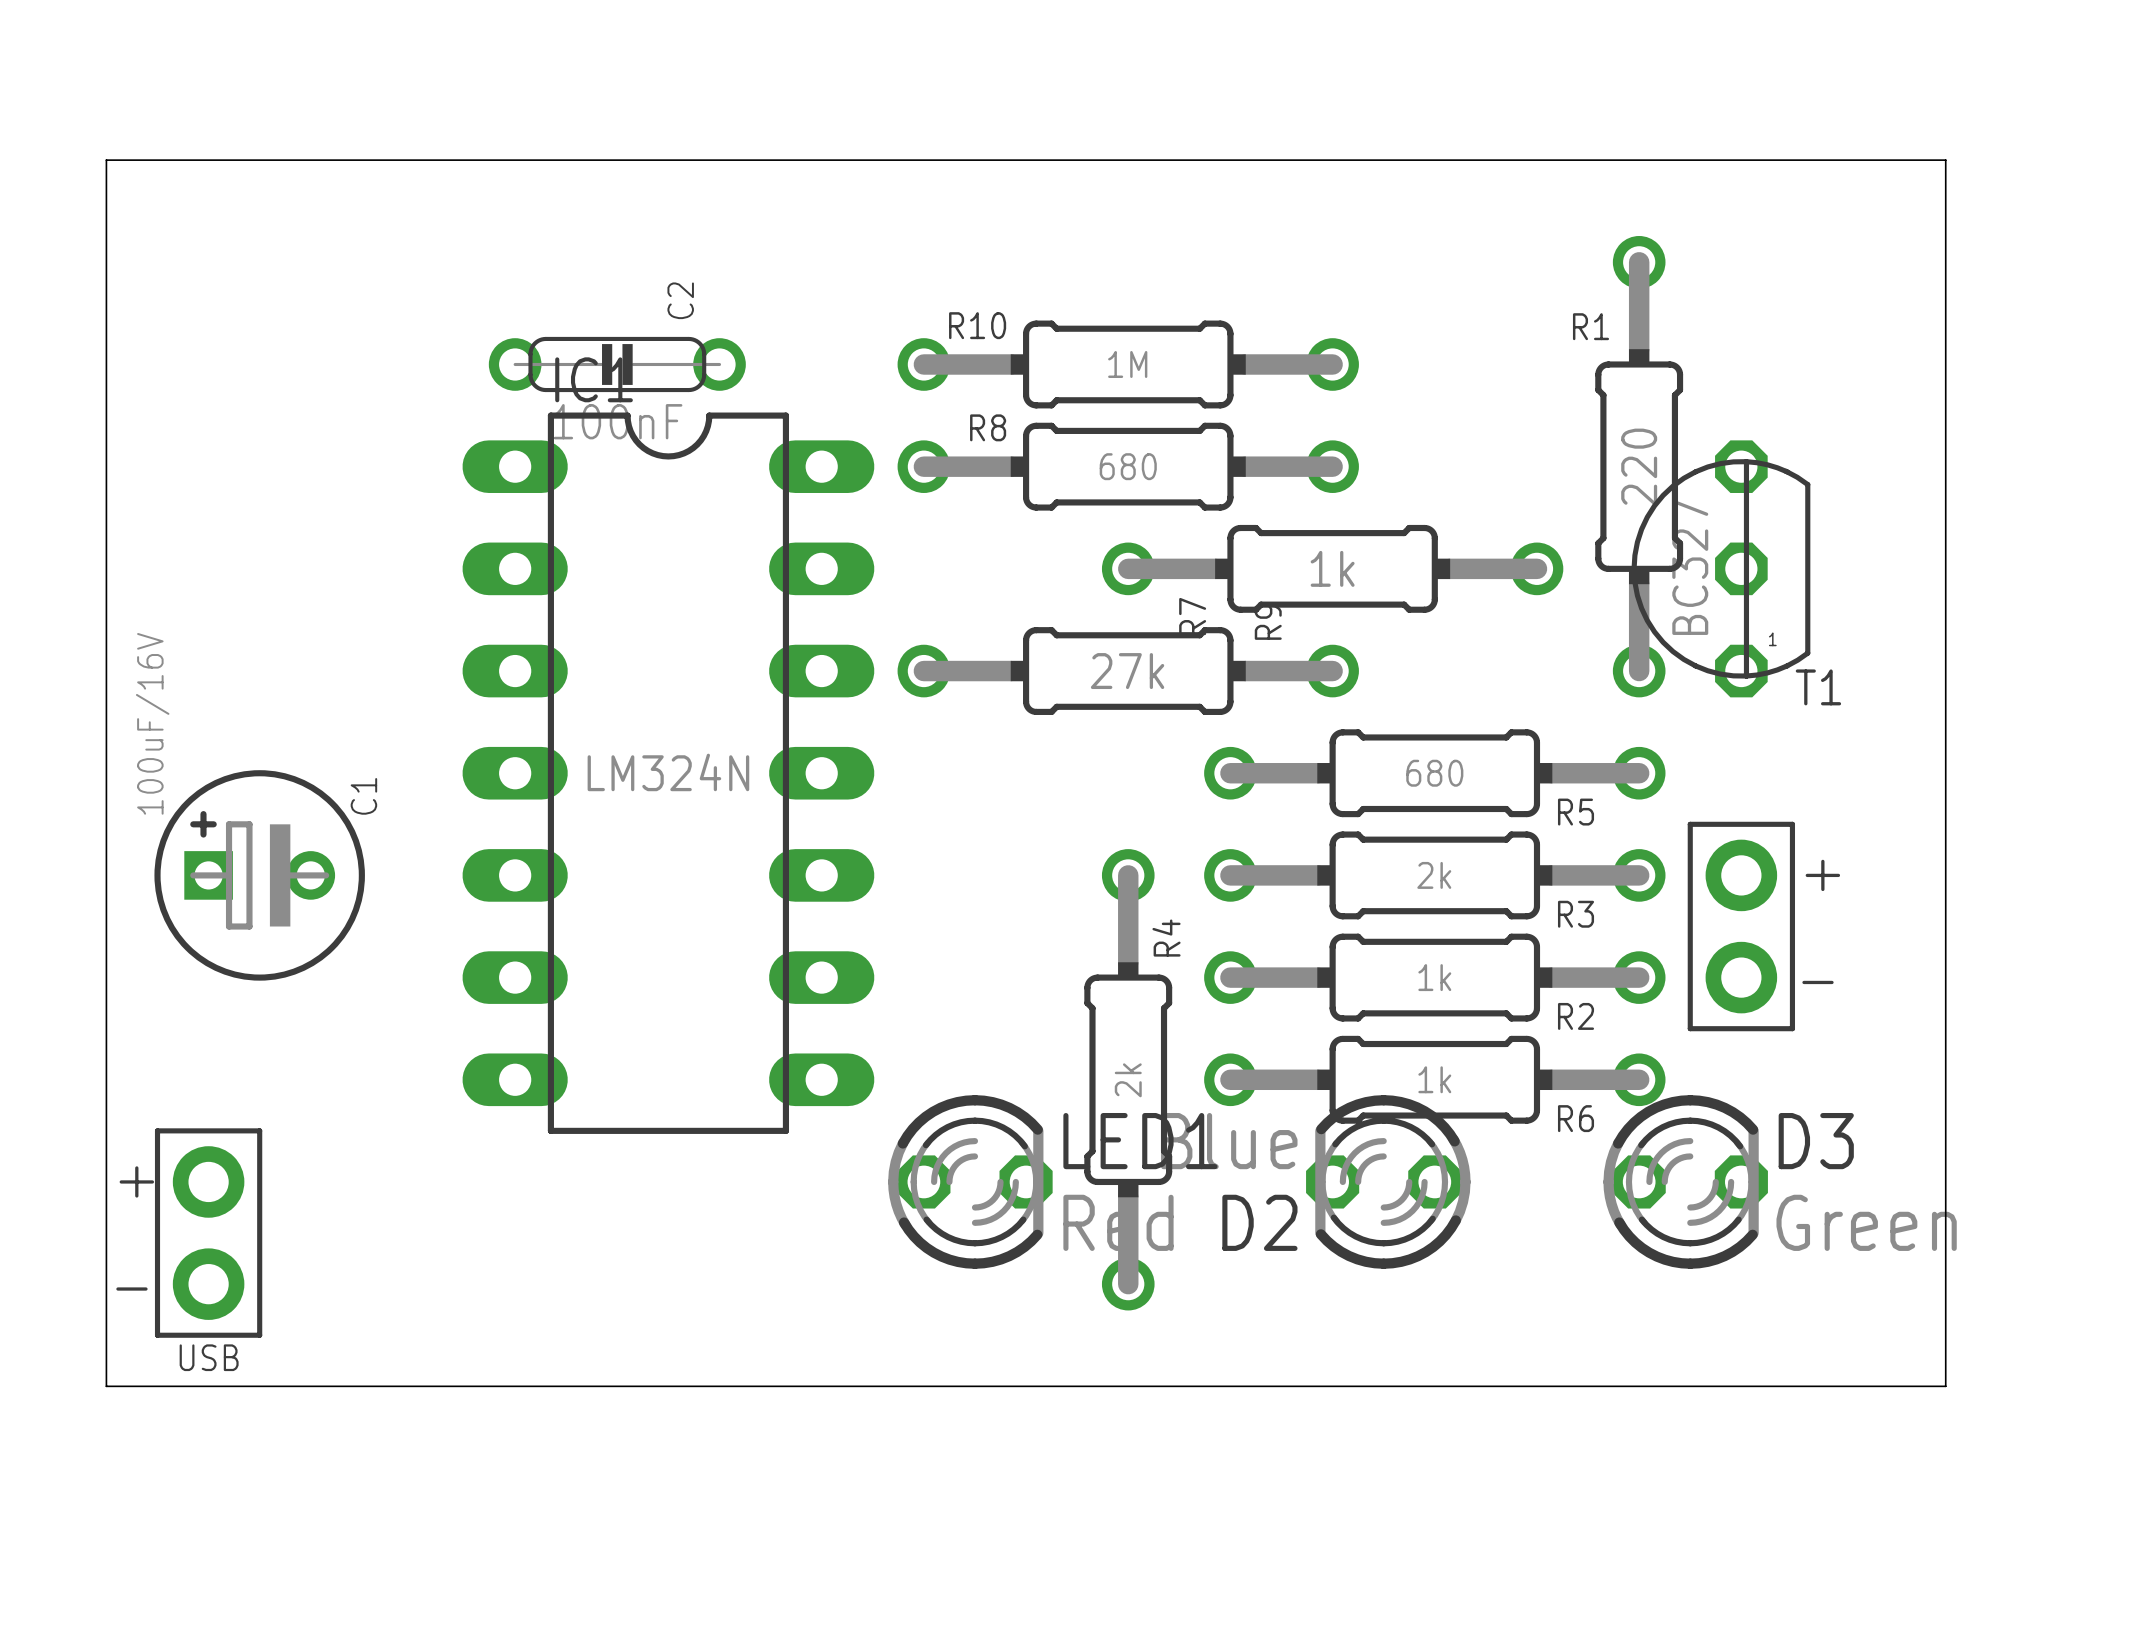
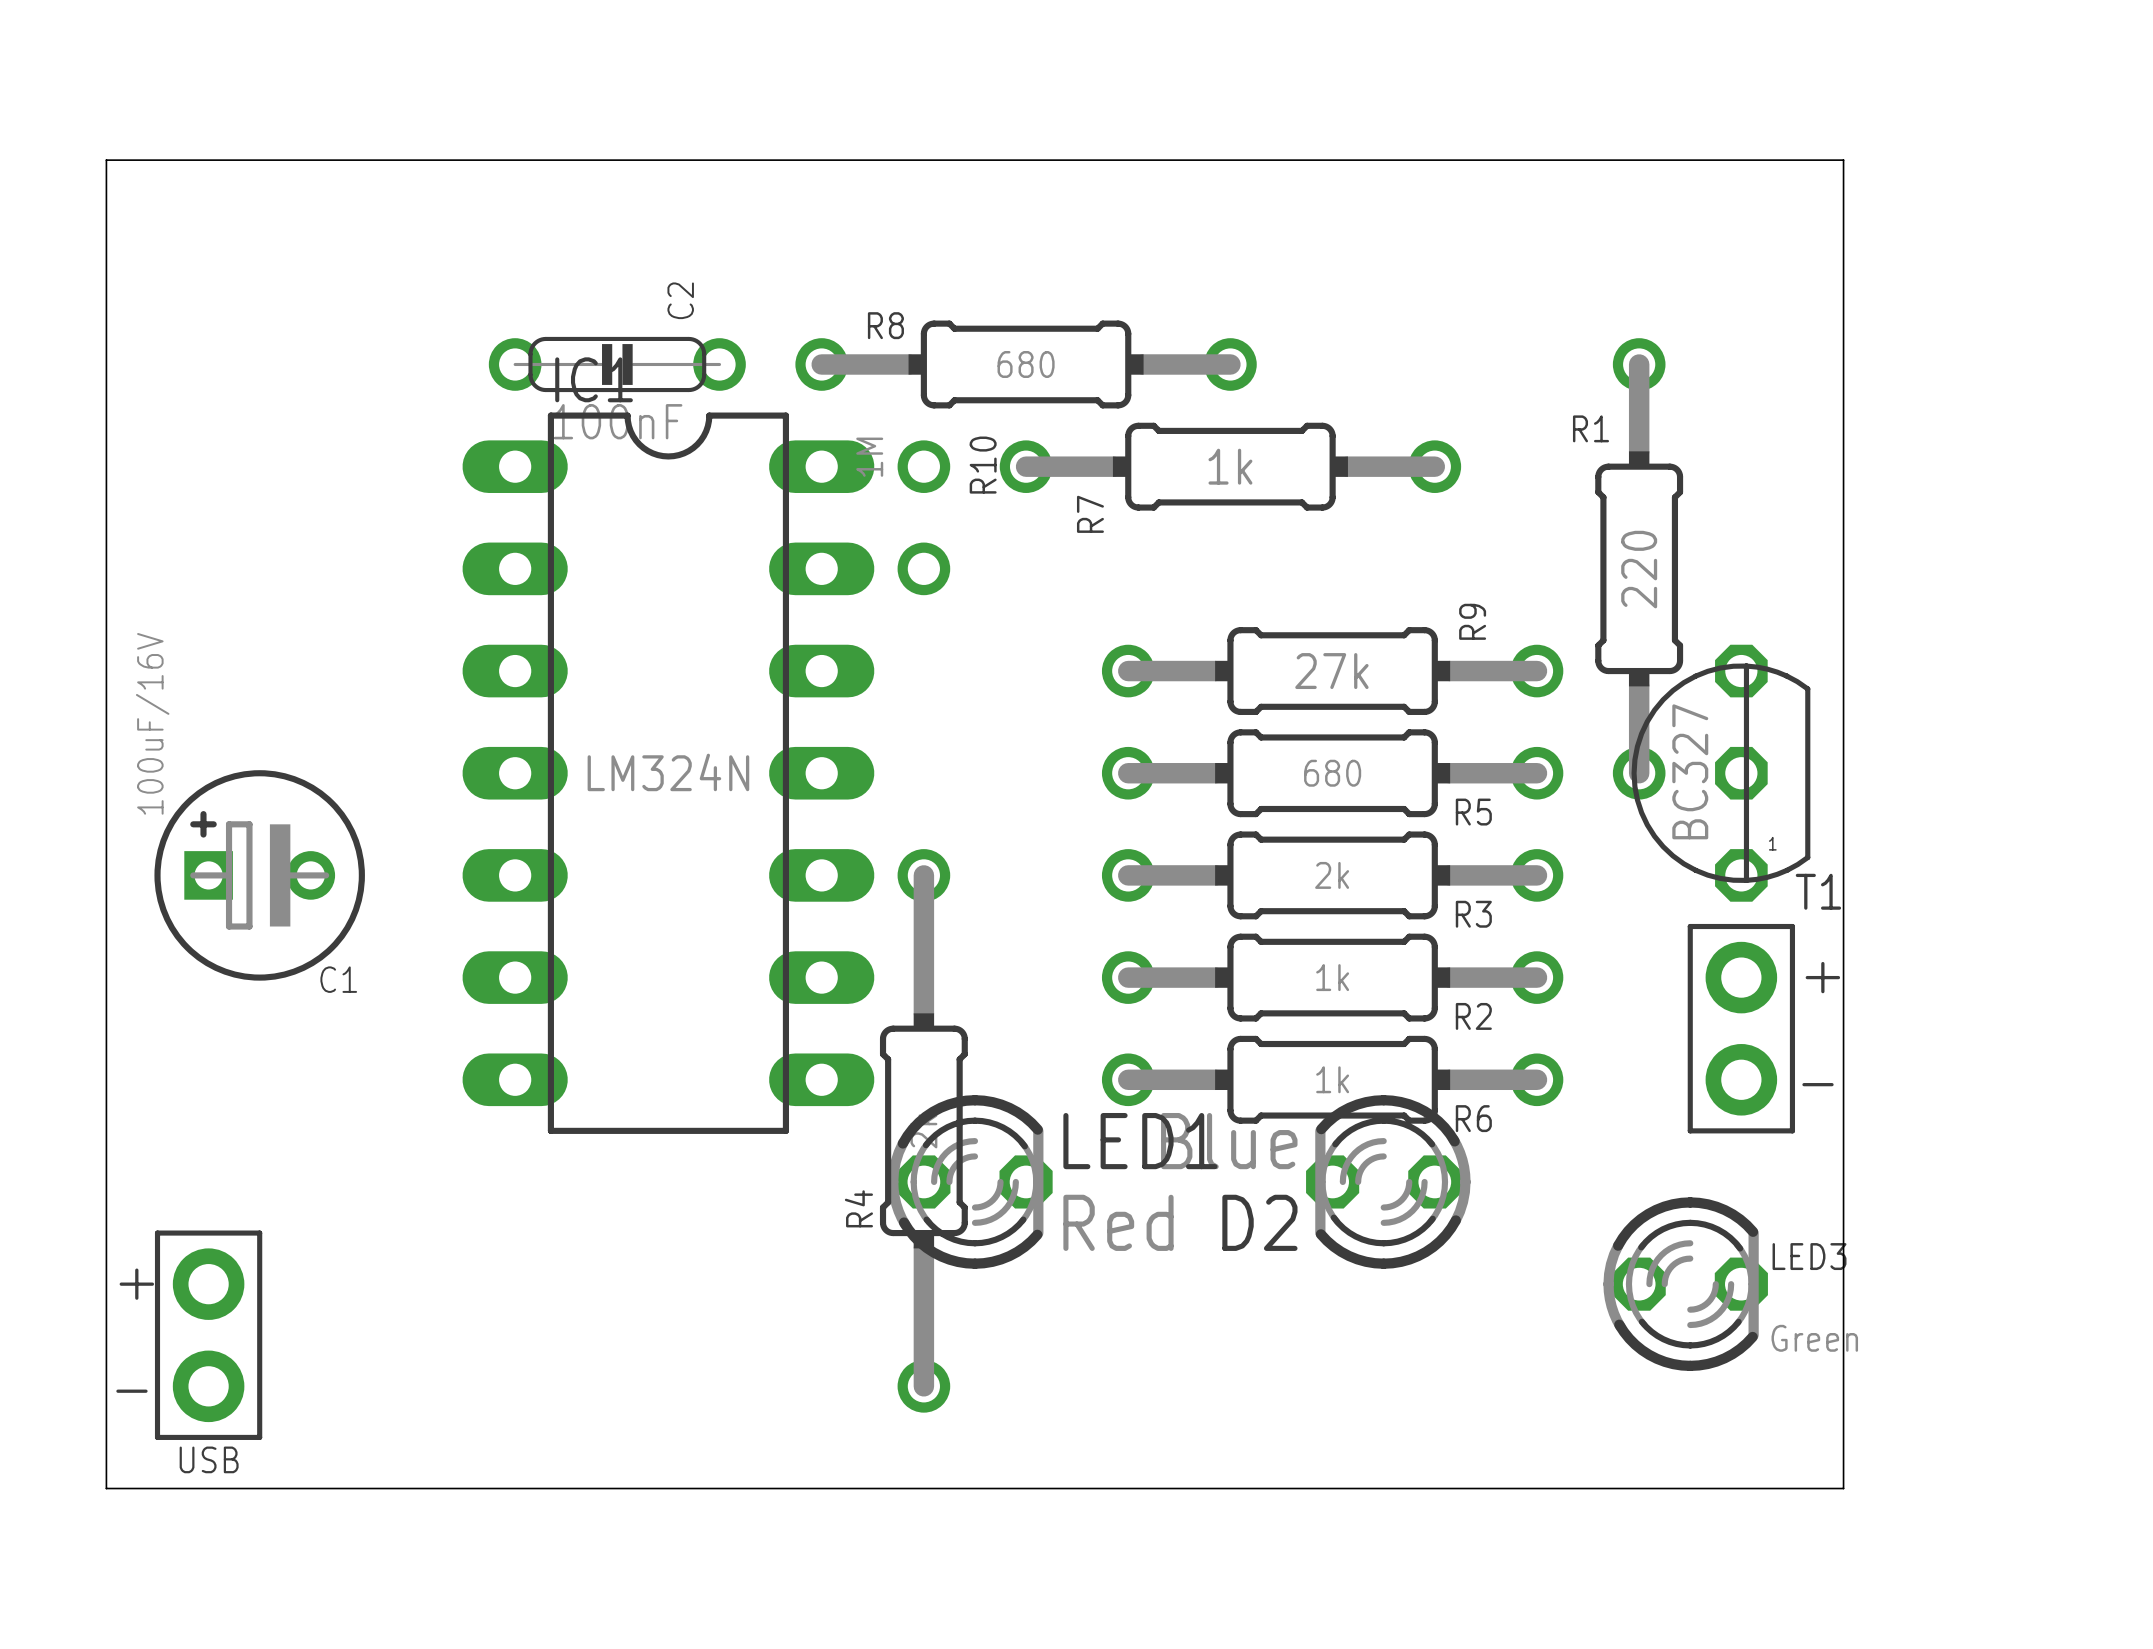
board edge: (1843, 160) (1945, 160) (1945, 1386) (106, 1386) -> (1843, 160) (1843, 1488) (106, 1488) (106, 1386)
R10 footprint: [897, 320, 1359, 409] -> [897, 440, 951, 596]
R10 name position: R10 (977, 325) -> R10 (983, 465)
R8 position: (1128, 466) -> (1026, 364)
R1 position: (1639, 466) -> (1639, 568)
R7 position: (1332, 568) -> (1230, 466)
T1 position: (1720, 568) -> (1720, 773)
R9 position: (1128, 671) -> (1332, 671)
R5 position: (1434, 773) -> (1332, 773)
C1 name rotation: 0° (363, 796) -> 90° clockwise (338, 979)
C1 name position: C1 (363, 796) -> C1 (338, 979)
R4 footprint: [1084, 849, 1173, 1311] -> [879, 849, 968, 1413]
R3 position: (1434, 875) -> (1332, 875)
part position: (1741, 926) -> (1741, 1028)
R4 name position: R4 (1166, 938) -> R4 (858, 1208)
R2 position: (1434, 977) -> (1332, 977)
R6 position: (1434, 1079) -> (1332, 1079)
D3: Green (1685, 1181) -> none
USB position: (208, 1233) -> (208, 1335)
LED3: none -> Green (1685, 1284)

